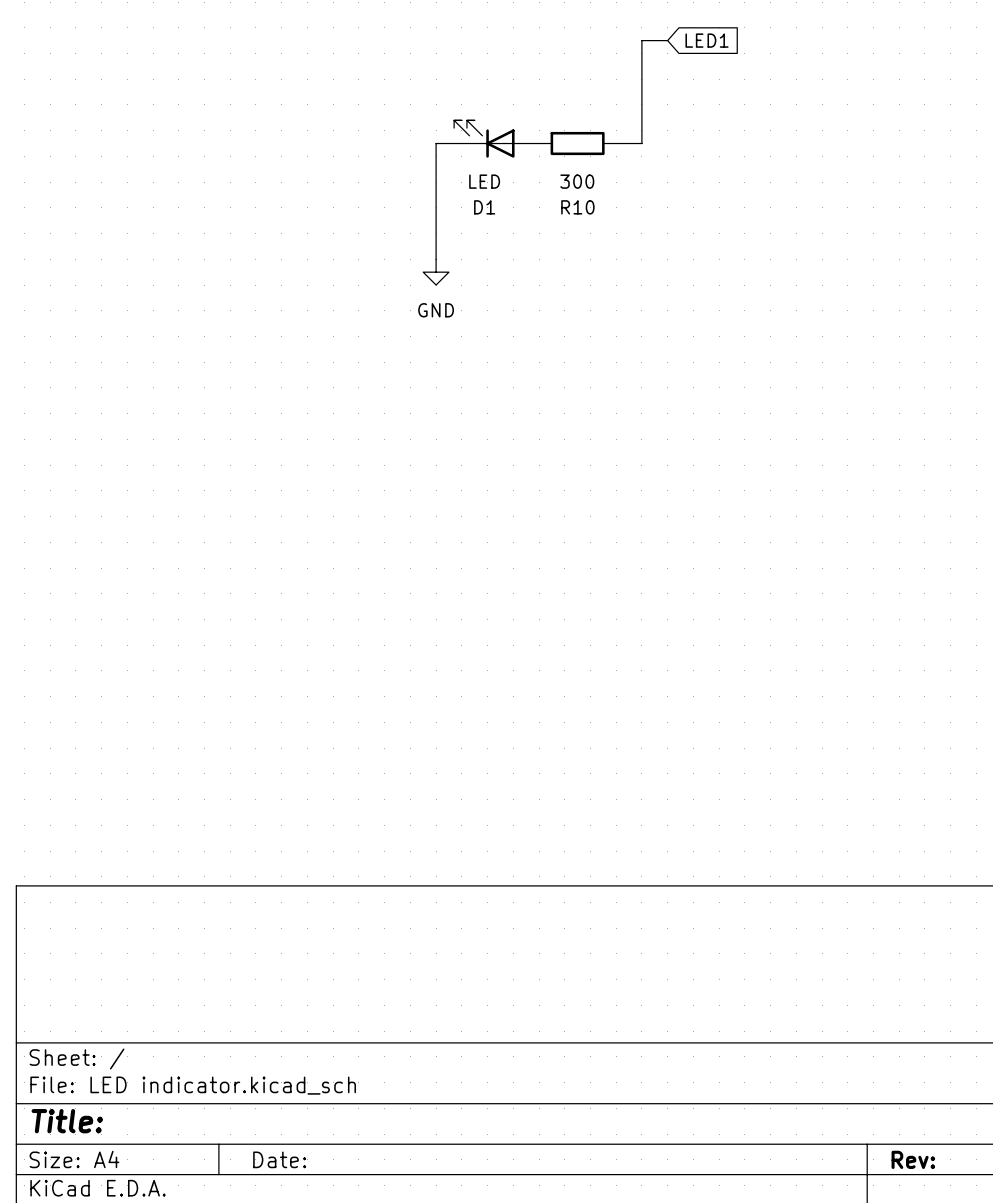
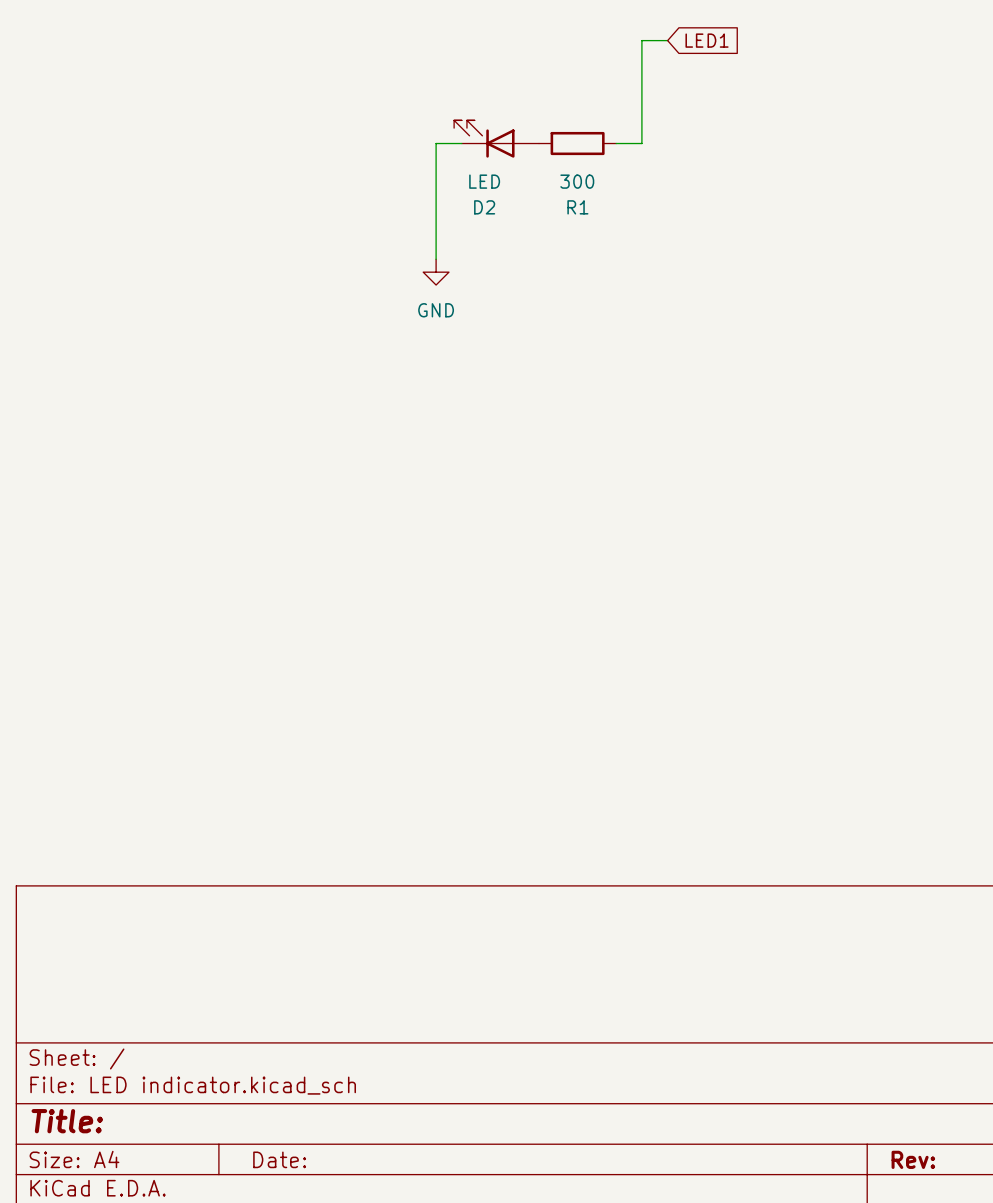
D1 name: D1 (484, 207) -> D2 (484, 207)
R10 name: R10 (577, 207) -> R1 (577, 207)

